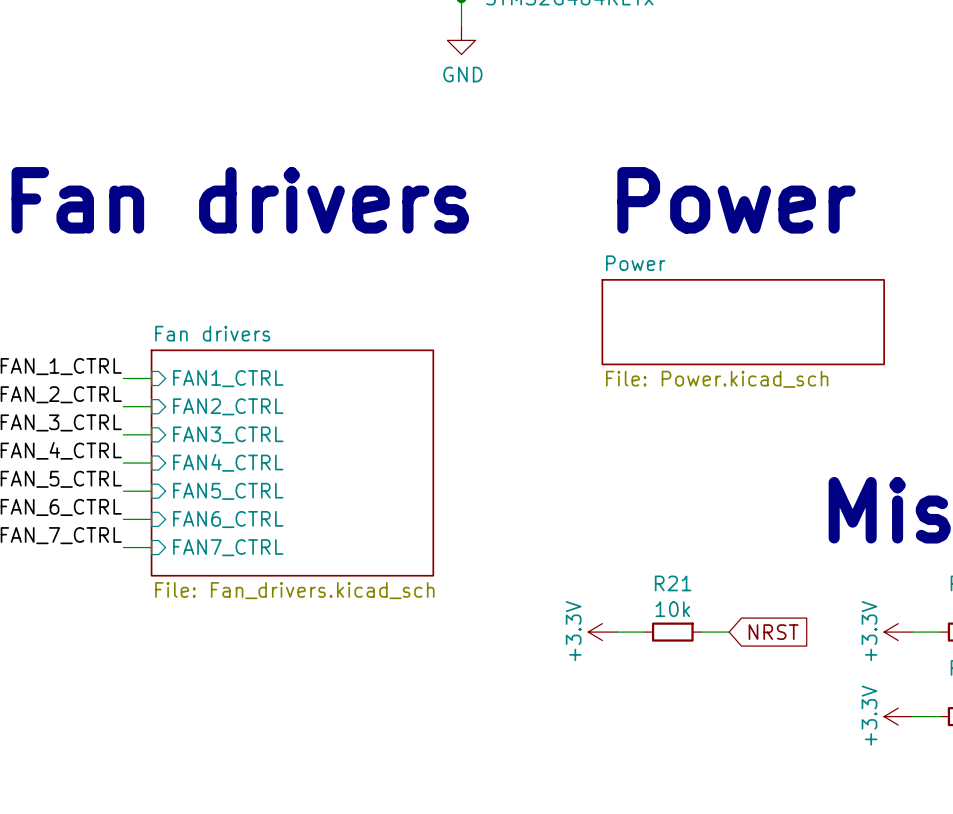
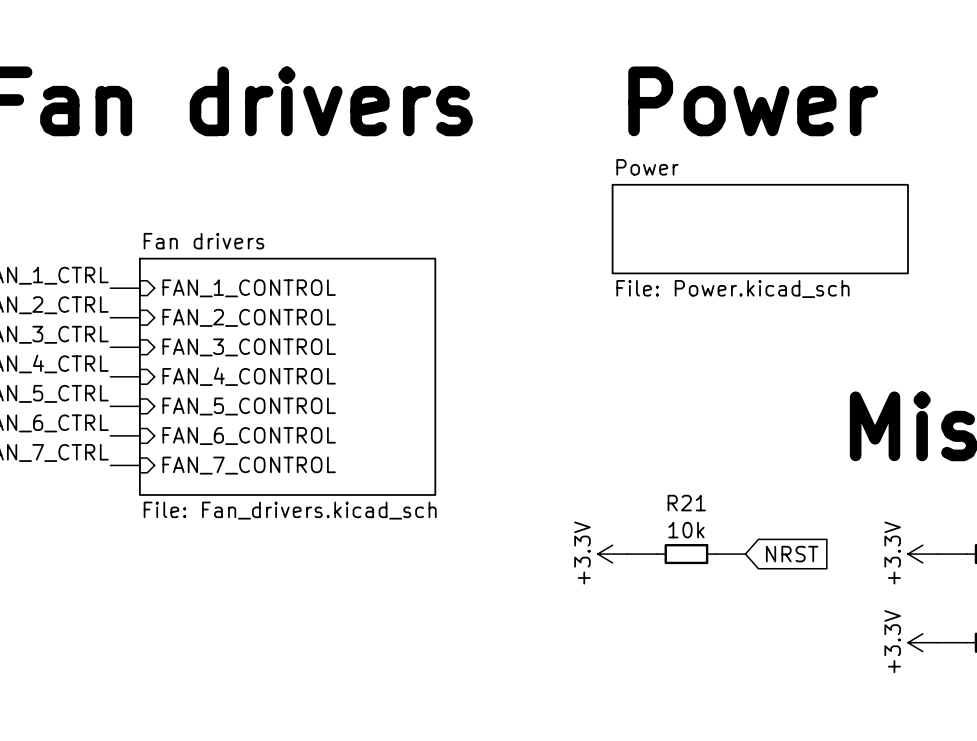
sheet pin: FAN1_CTRL (228, 378) -> FAN_1_CONTROL (249, 288)
sheet pin: FAN2_CTRL (228, 406) -> FAN_2_CONTROL (249, 317)
sheet pin: FAN3_CTRL (228, 434) -> FAN_3_CONTROL (249, 347)
sheet pin: FAN4_CTRL (228, 462) -> FAN_4_CONTROL (249, 376)
sheet pin: FAN5_CTRL (228, 491) -> FAN_5_CONTROL (249, 406)
sheet pin: FAN6_CTRL (228, 519) -> FAN_6_CONTROL (249, 436)
sheet pin: FAN7_CTRL (228, 547) -> FAN_7_CONTROL (249, 465)

